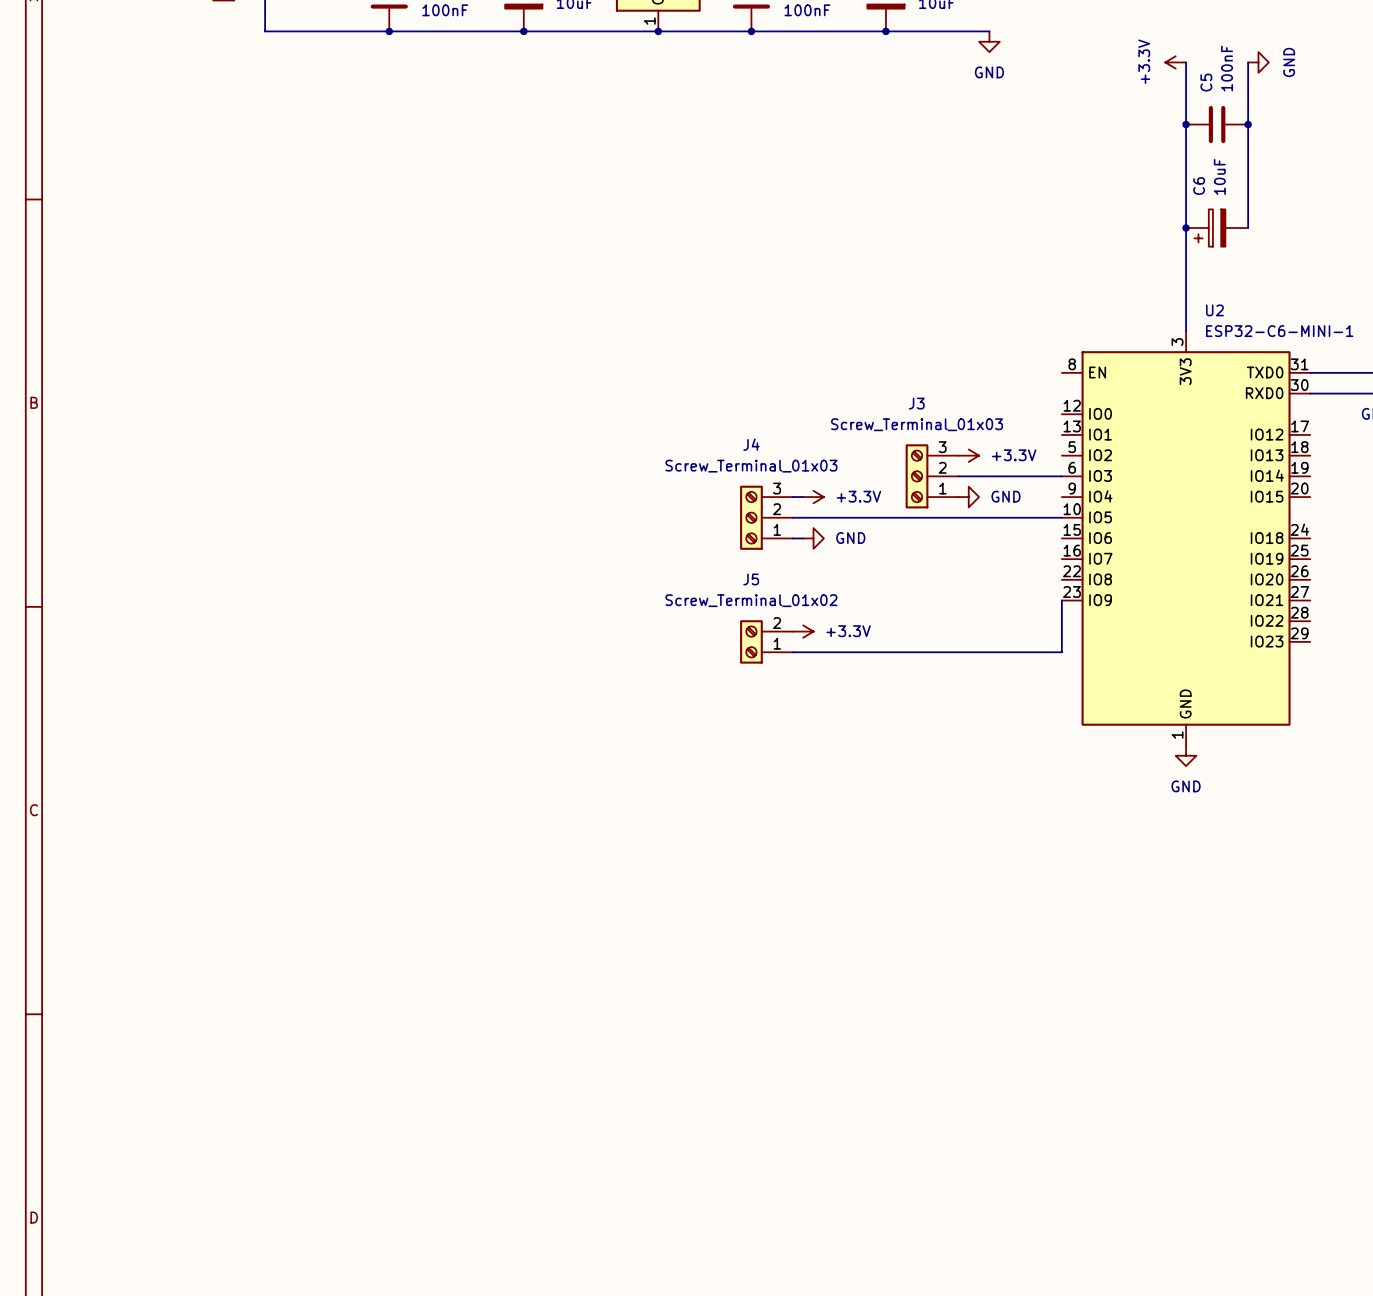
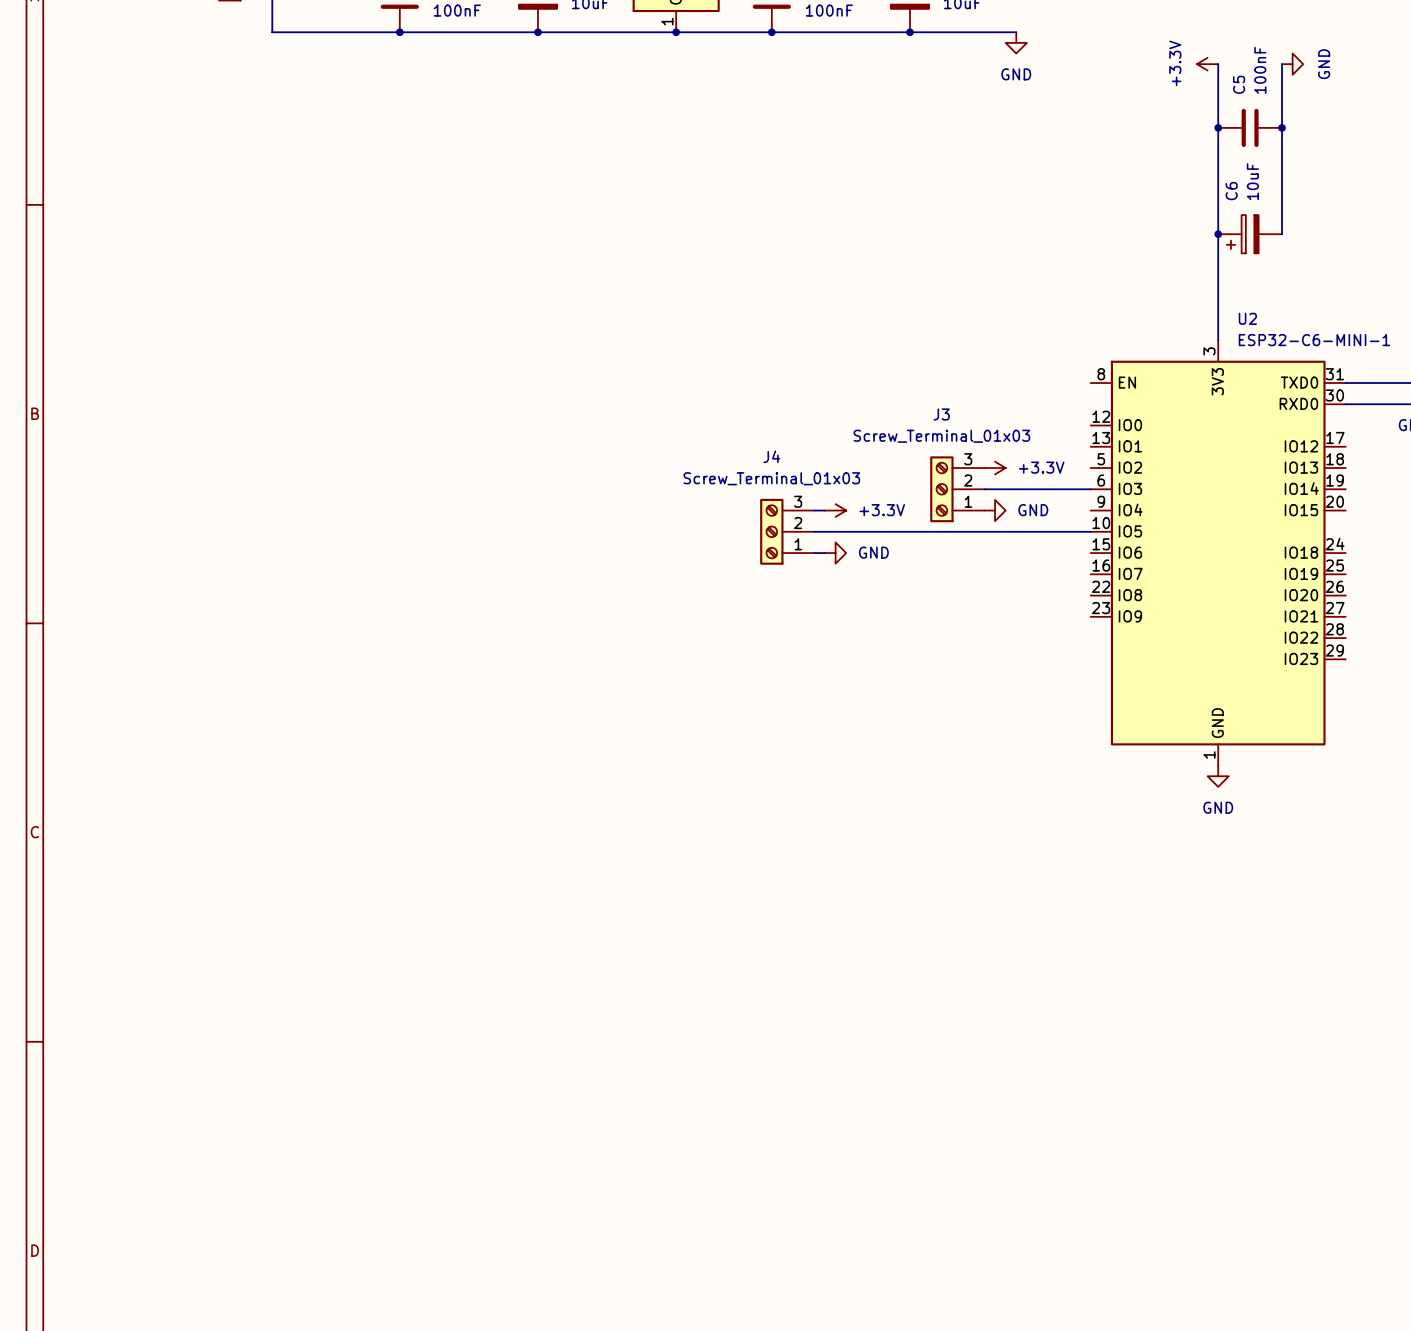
wire: (1061, 600) (1061, 652) (792, 652) -> none
power symbol: +3.3V (803, 631) -> none
J5: Screw_Terminal_01x02 (766, 641) -> none

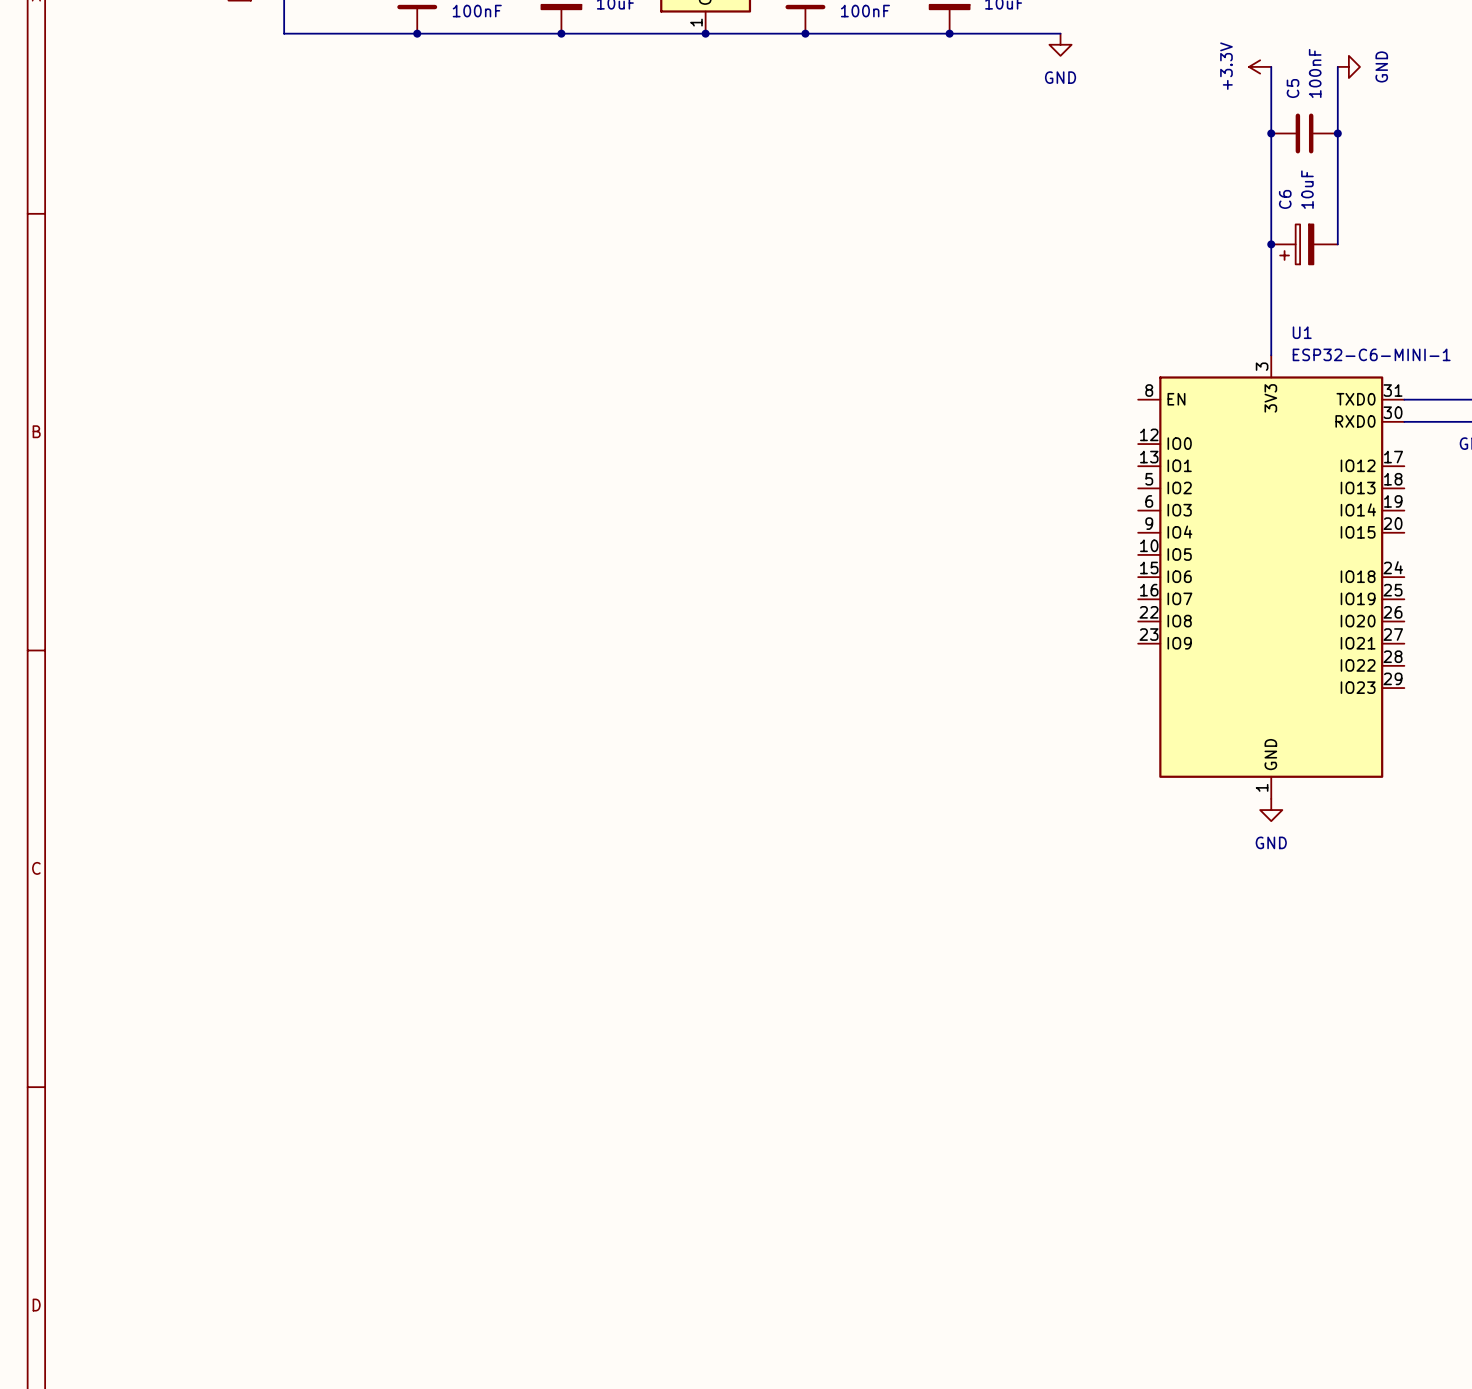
U2 name: U2 (1247, 318) -> U1 (1302, 332)
power symbol: +3.3V (995, 468) -> none
J3: Screw_Terminal_01x03 (957, 489) -> none
wire: (984, 489) (1090, 489) -> none
wire: (814, 510) (824, 510) -> none
power symbol: +3.3V (835, 510) -> none
power symbol: GND (995, 510) -> none
J4: Screw_Terminal_01x03 (787, 531) -> none
wire: (814, 531) (1090, 531) -> none
wire: (814, 553) (824, 553) -> none
power symbol: GND (835, 553) -> none

